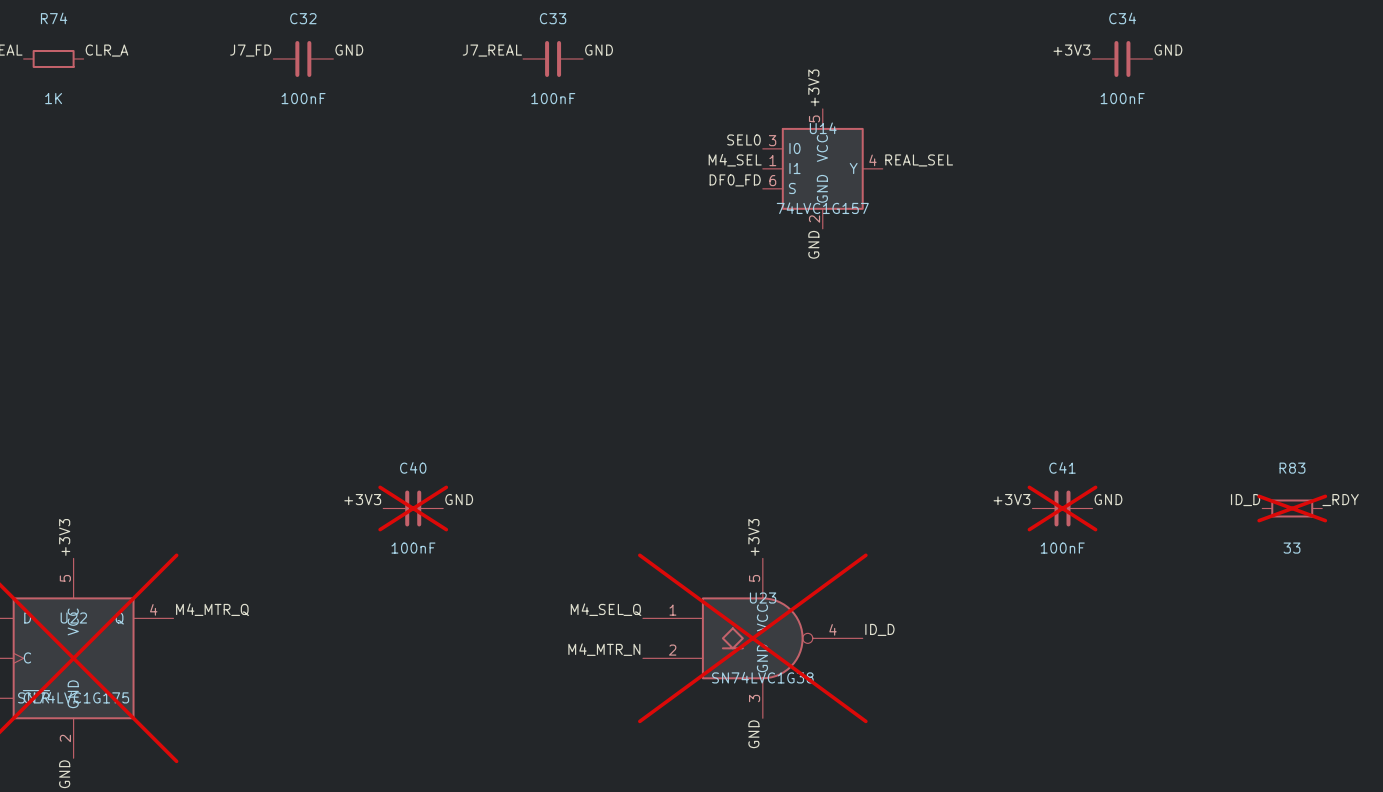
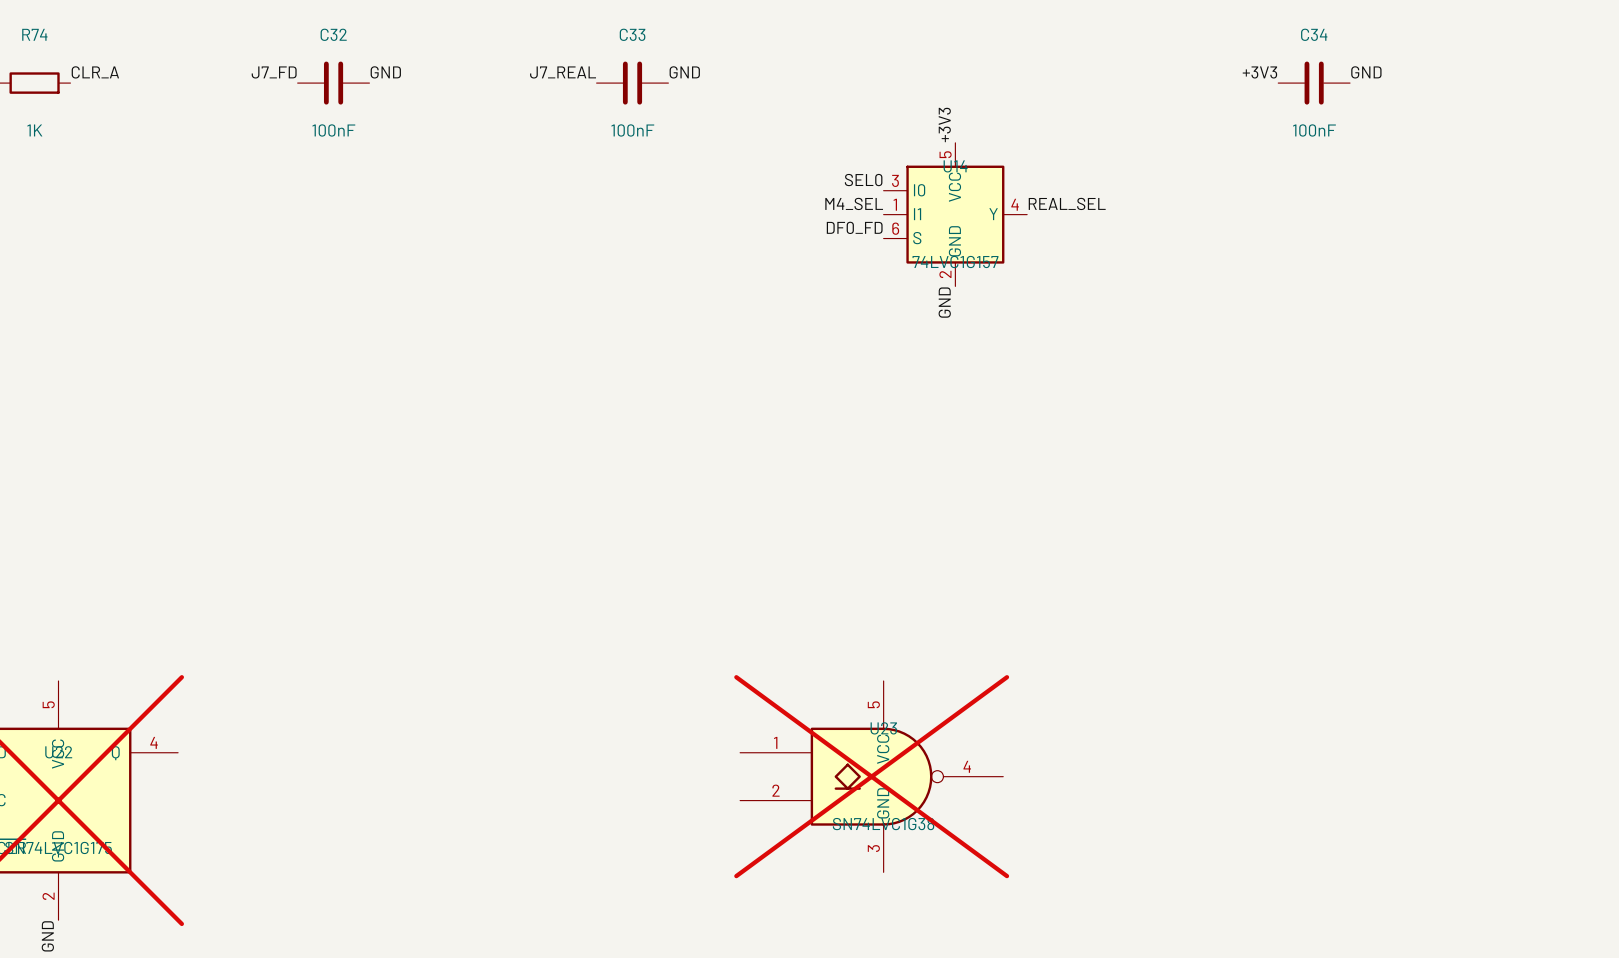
label: +3V3 (362, 499) -> none
label: GND (459, 499) -> none
label: +3V3 (1012, 499) -> none
label: GND (1108, 499) -> none
label: ID_D (1245, 500) -> none
label: _RDY (1340, 500) -> none
C40: 100nF (413, 508) -> none
C41: 100nF (1062, 508) -> none
R83: 33 (1292, 508) -> none
label: +3V3 (64, 537) -> none
label: +3V3 (753, 537) -> none
label: M4_MTR_Q (212, 609) -> none
label: M4_SEL_Q (606, 609) -> none
label: ID_D (879, 629) -> none
label: M4_MTR_N (604, 649) -> none
label: GND (753, 734) -> none

